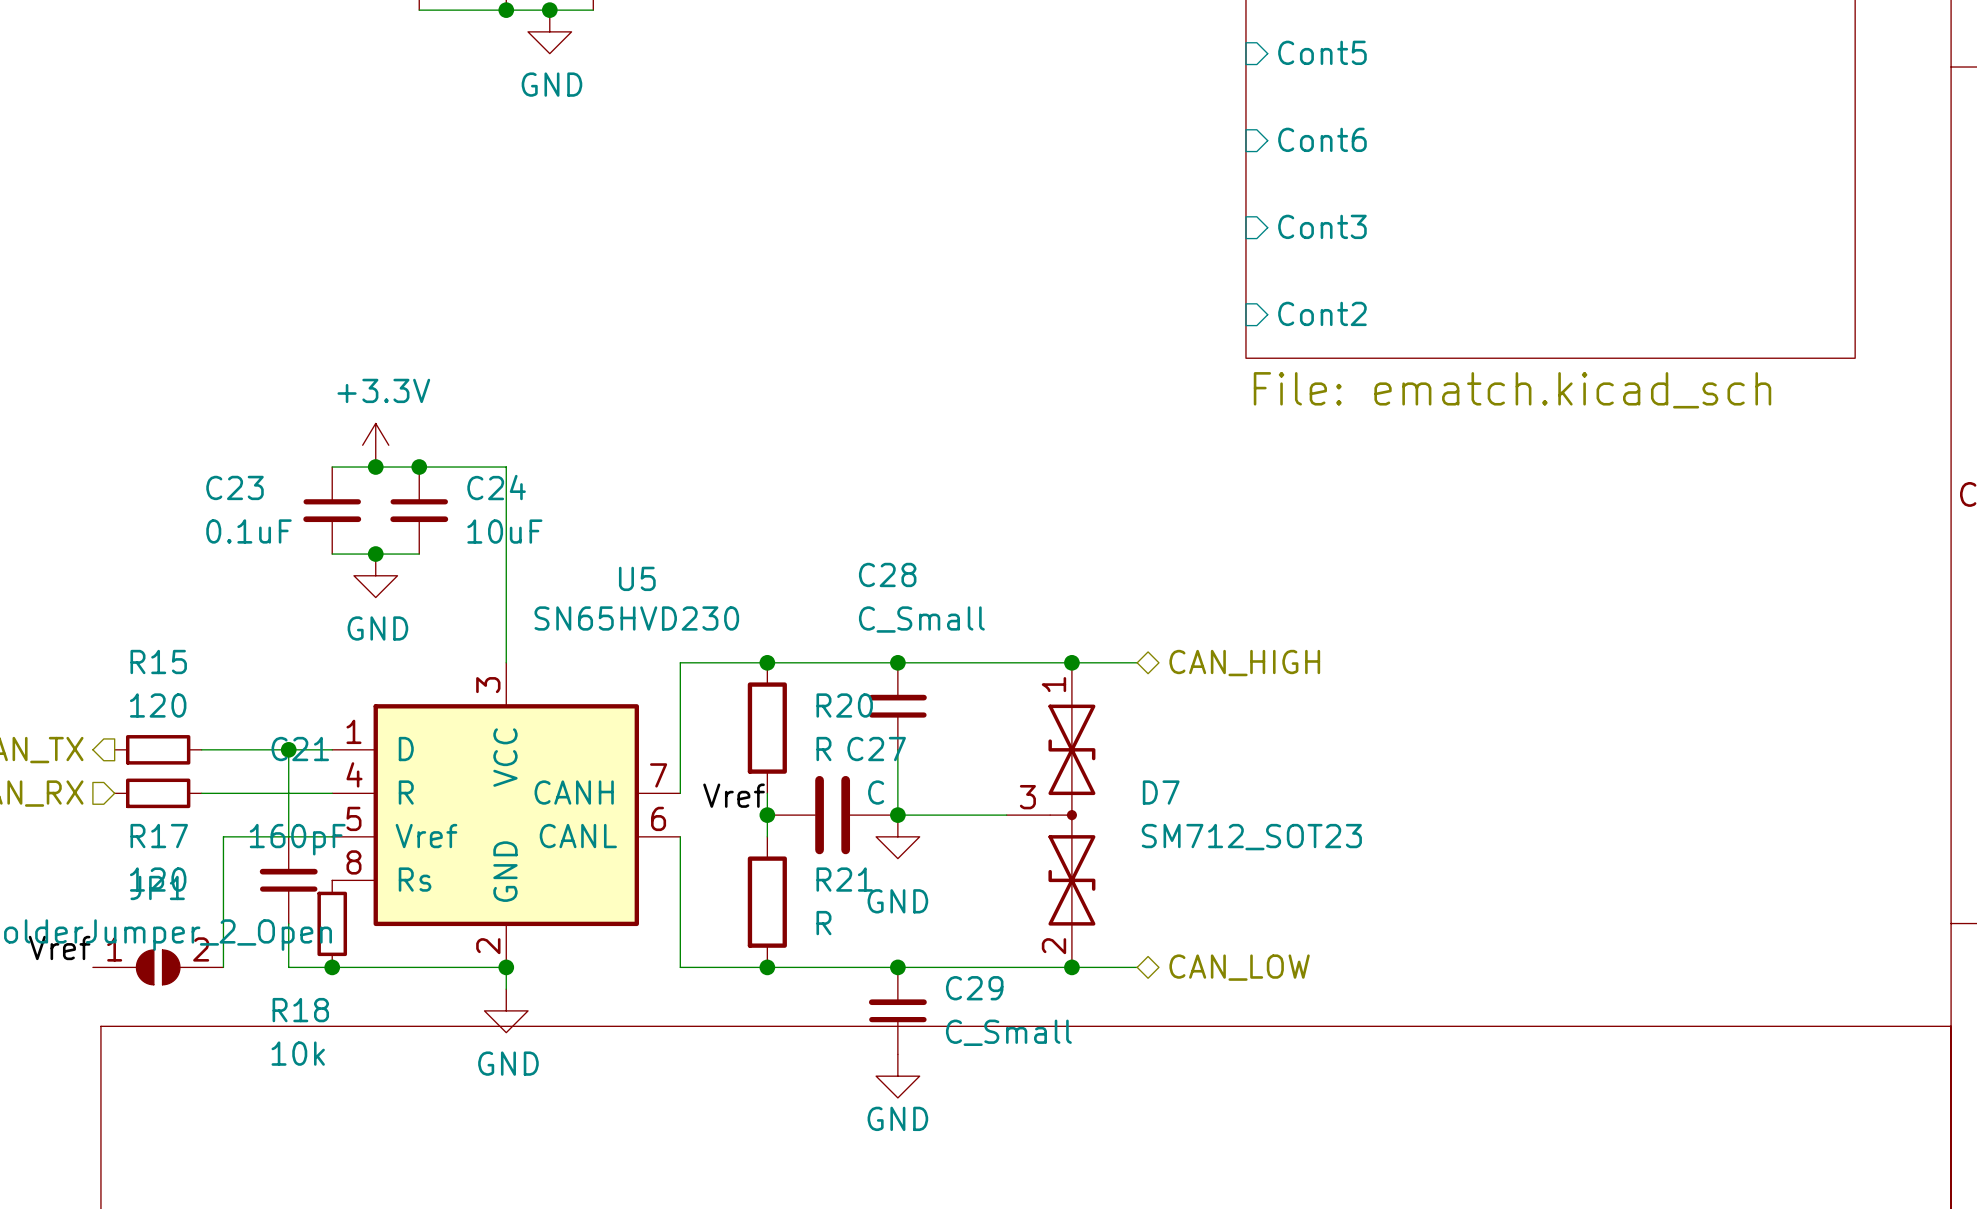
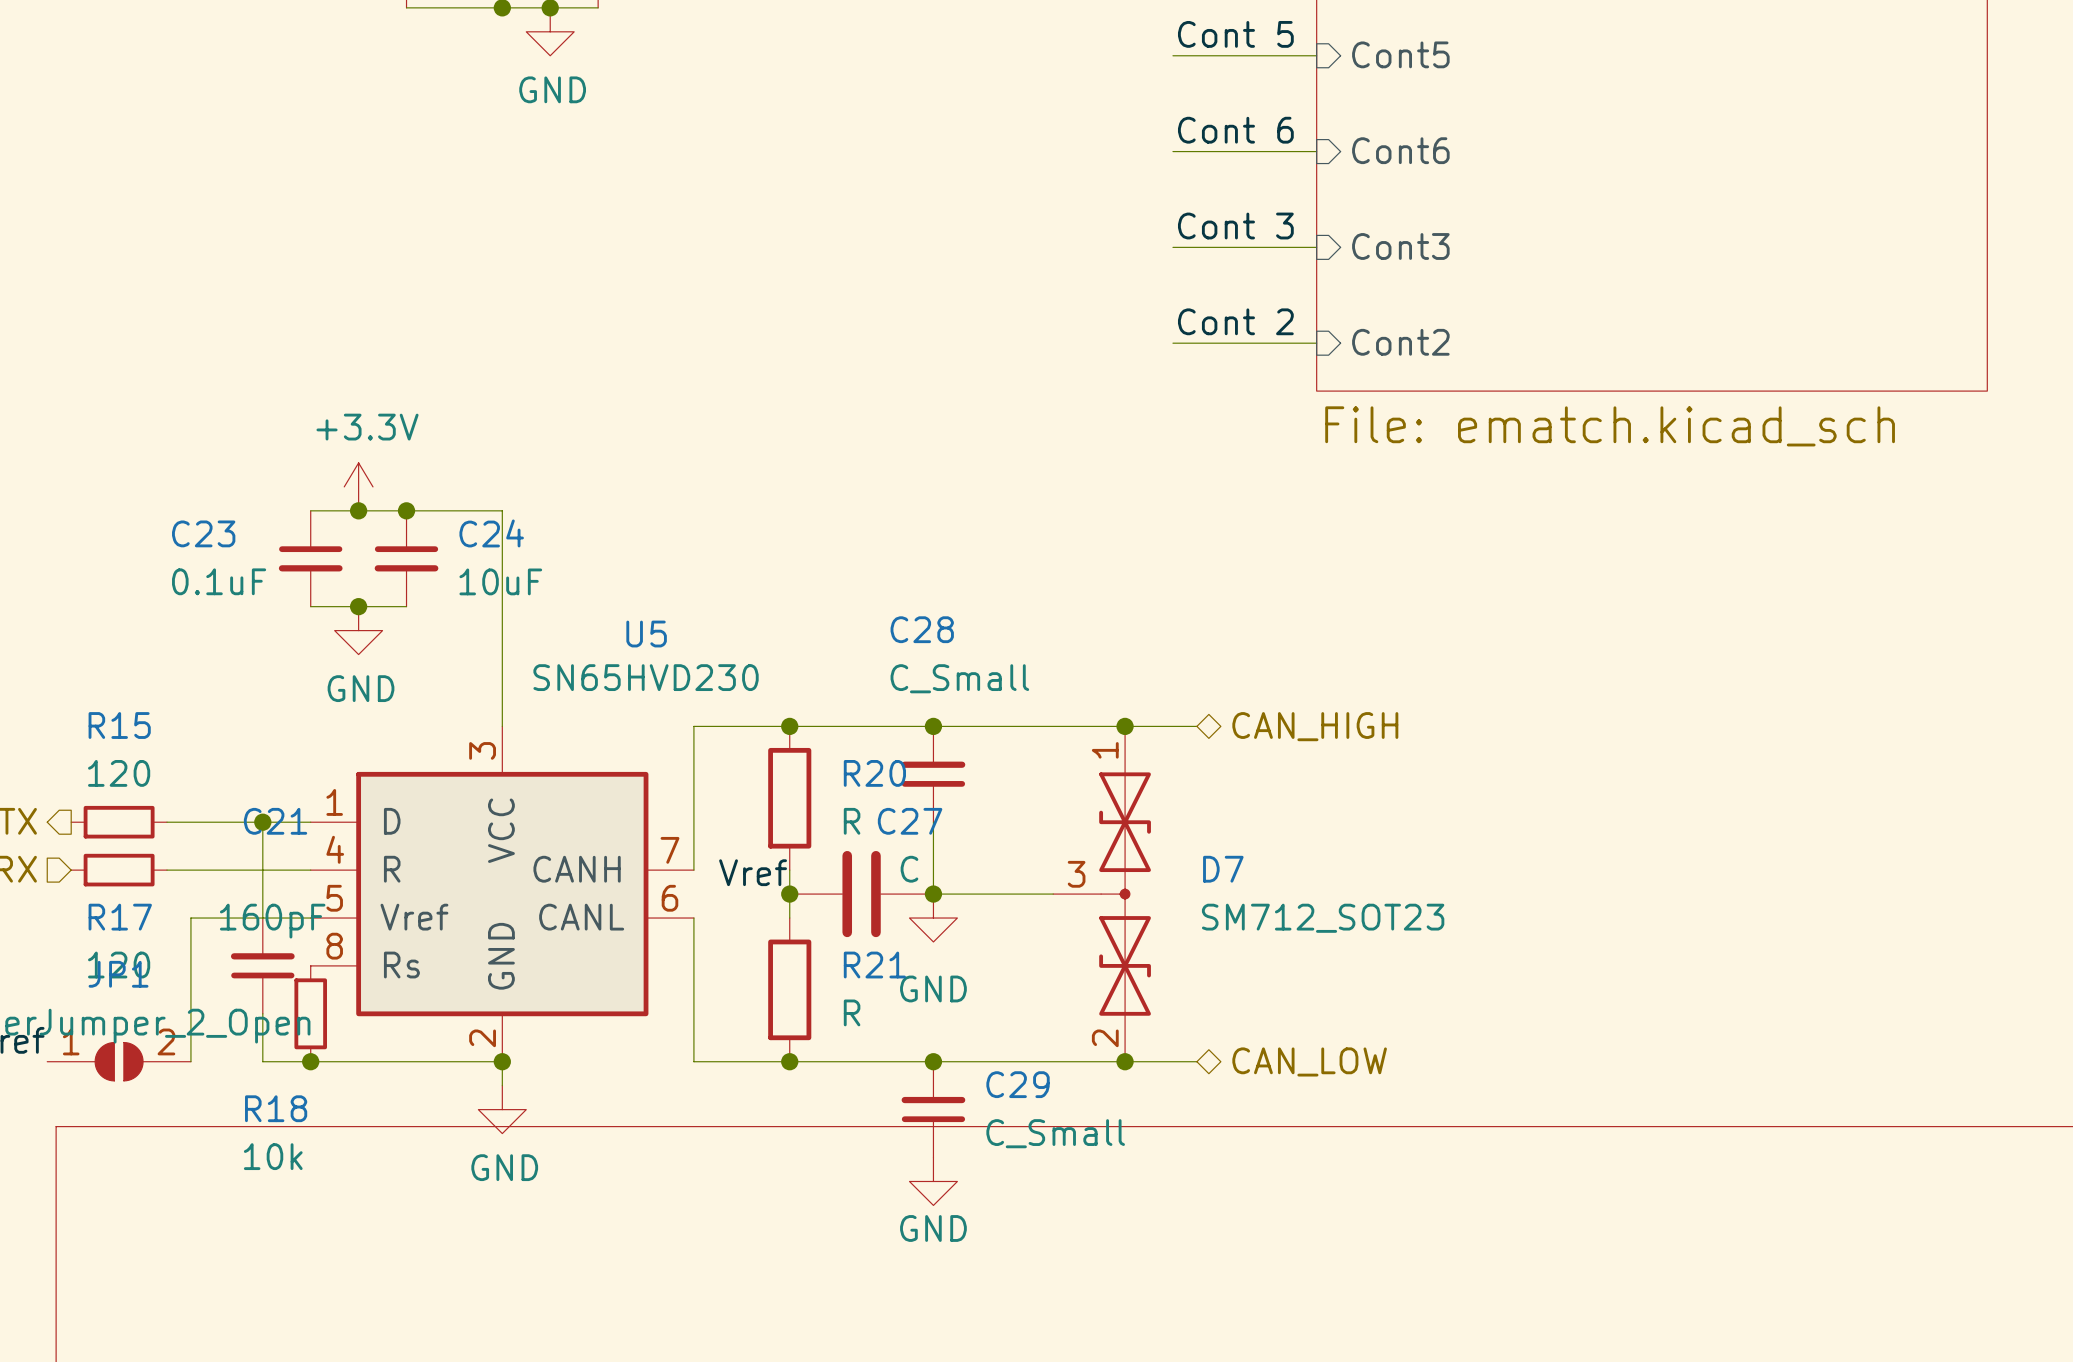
label: none -> Cont 5 (1235, 34)
wire: none -> (1172, 55) (1316, 55)
label: none -> Cont 6 (1235, 130)
wire: none -> (1172, 151) (1316, 151)
label: none -> Cont 3 (1235, 226)
wire: none -> (1172, 247) (1316, 247)
label: none -> Cont 2 (1235, 321)
wire: none -> (1172, 343) (1316, 343)

